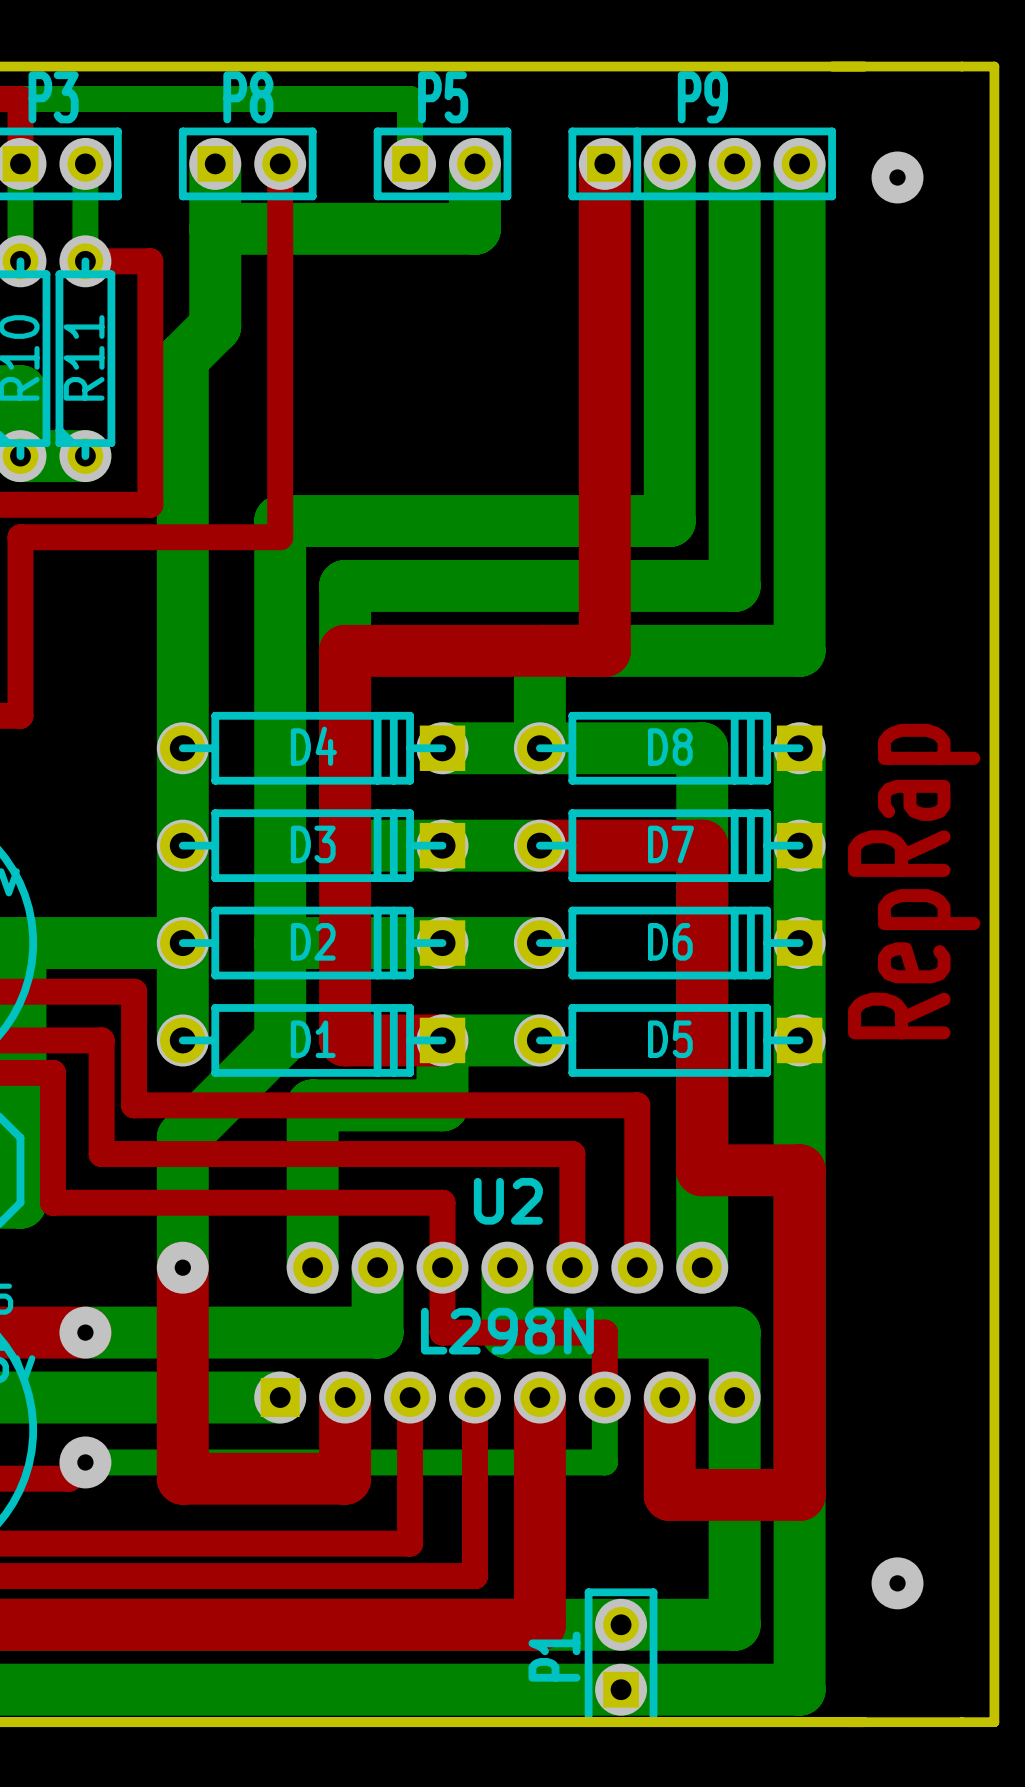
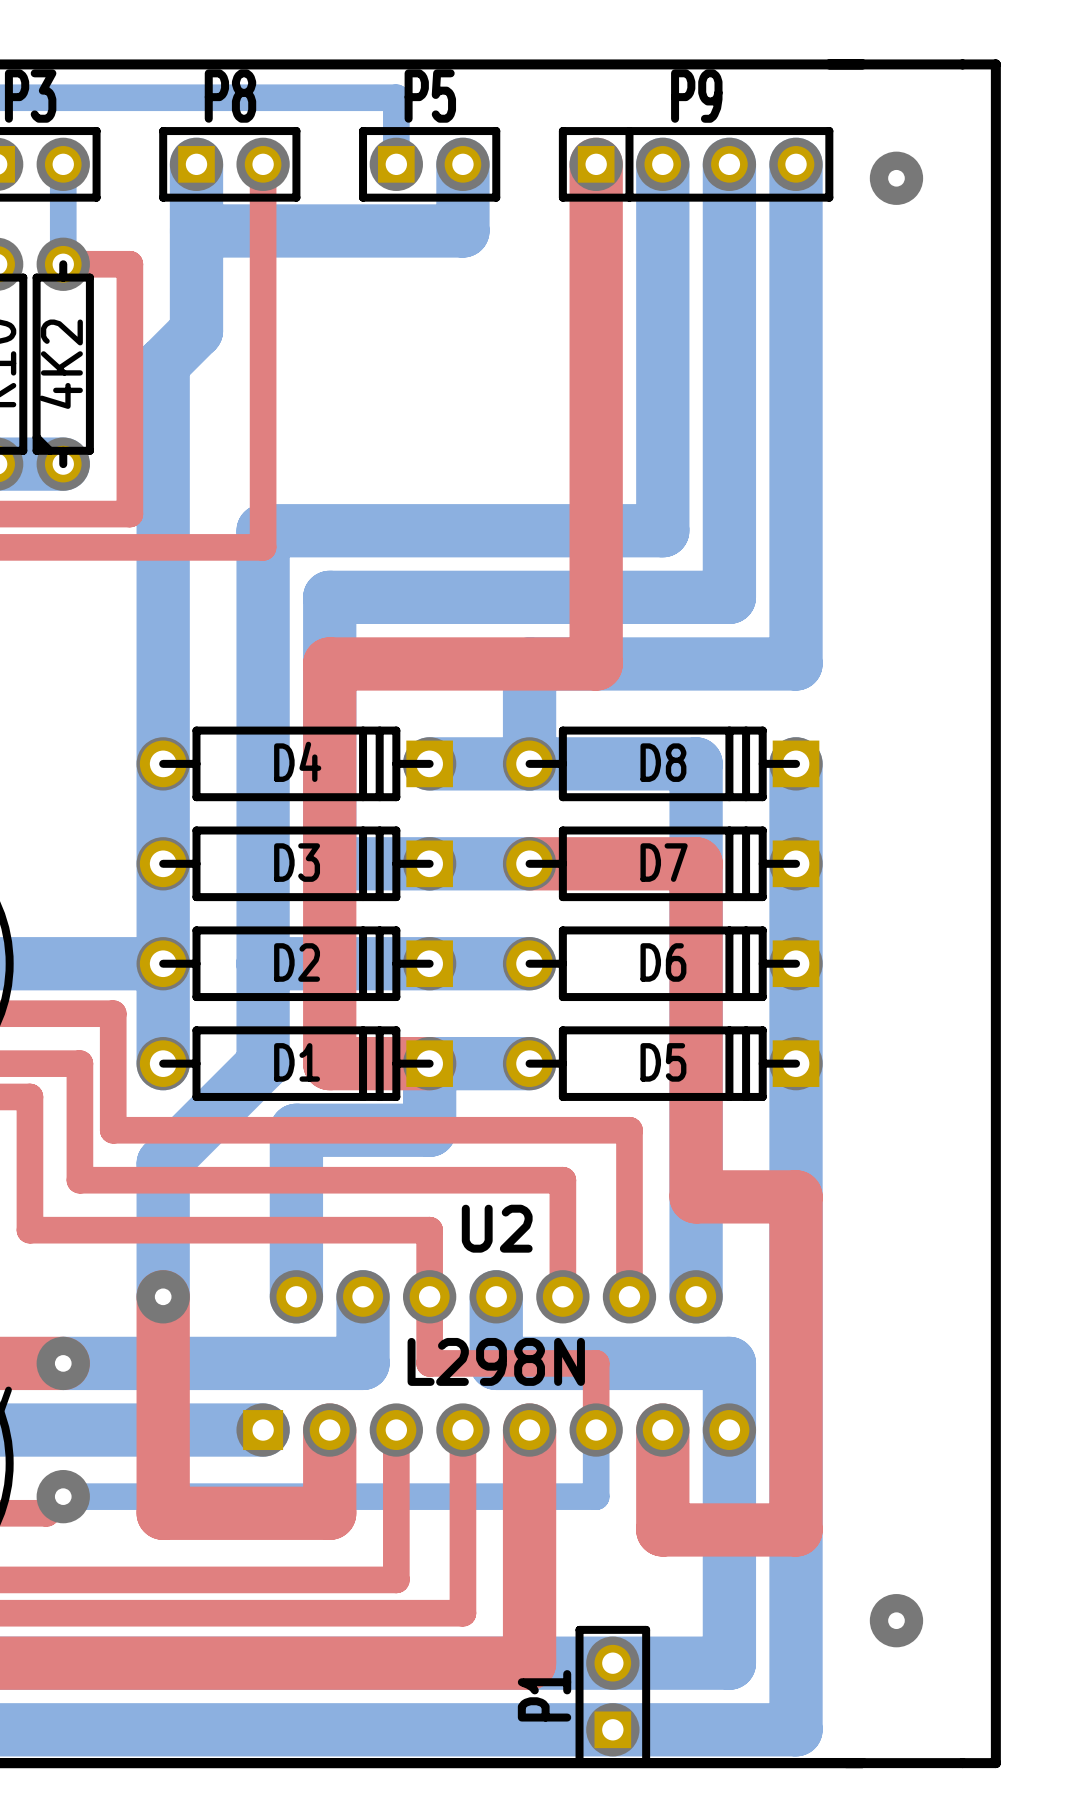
R11 name: R11 (84, 357) -> 4K2 (61, 364)
text: RepRap (914, 881) -> none

